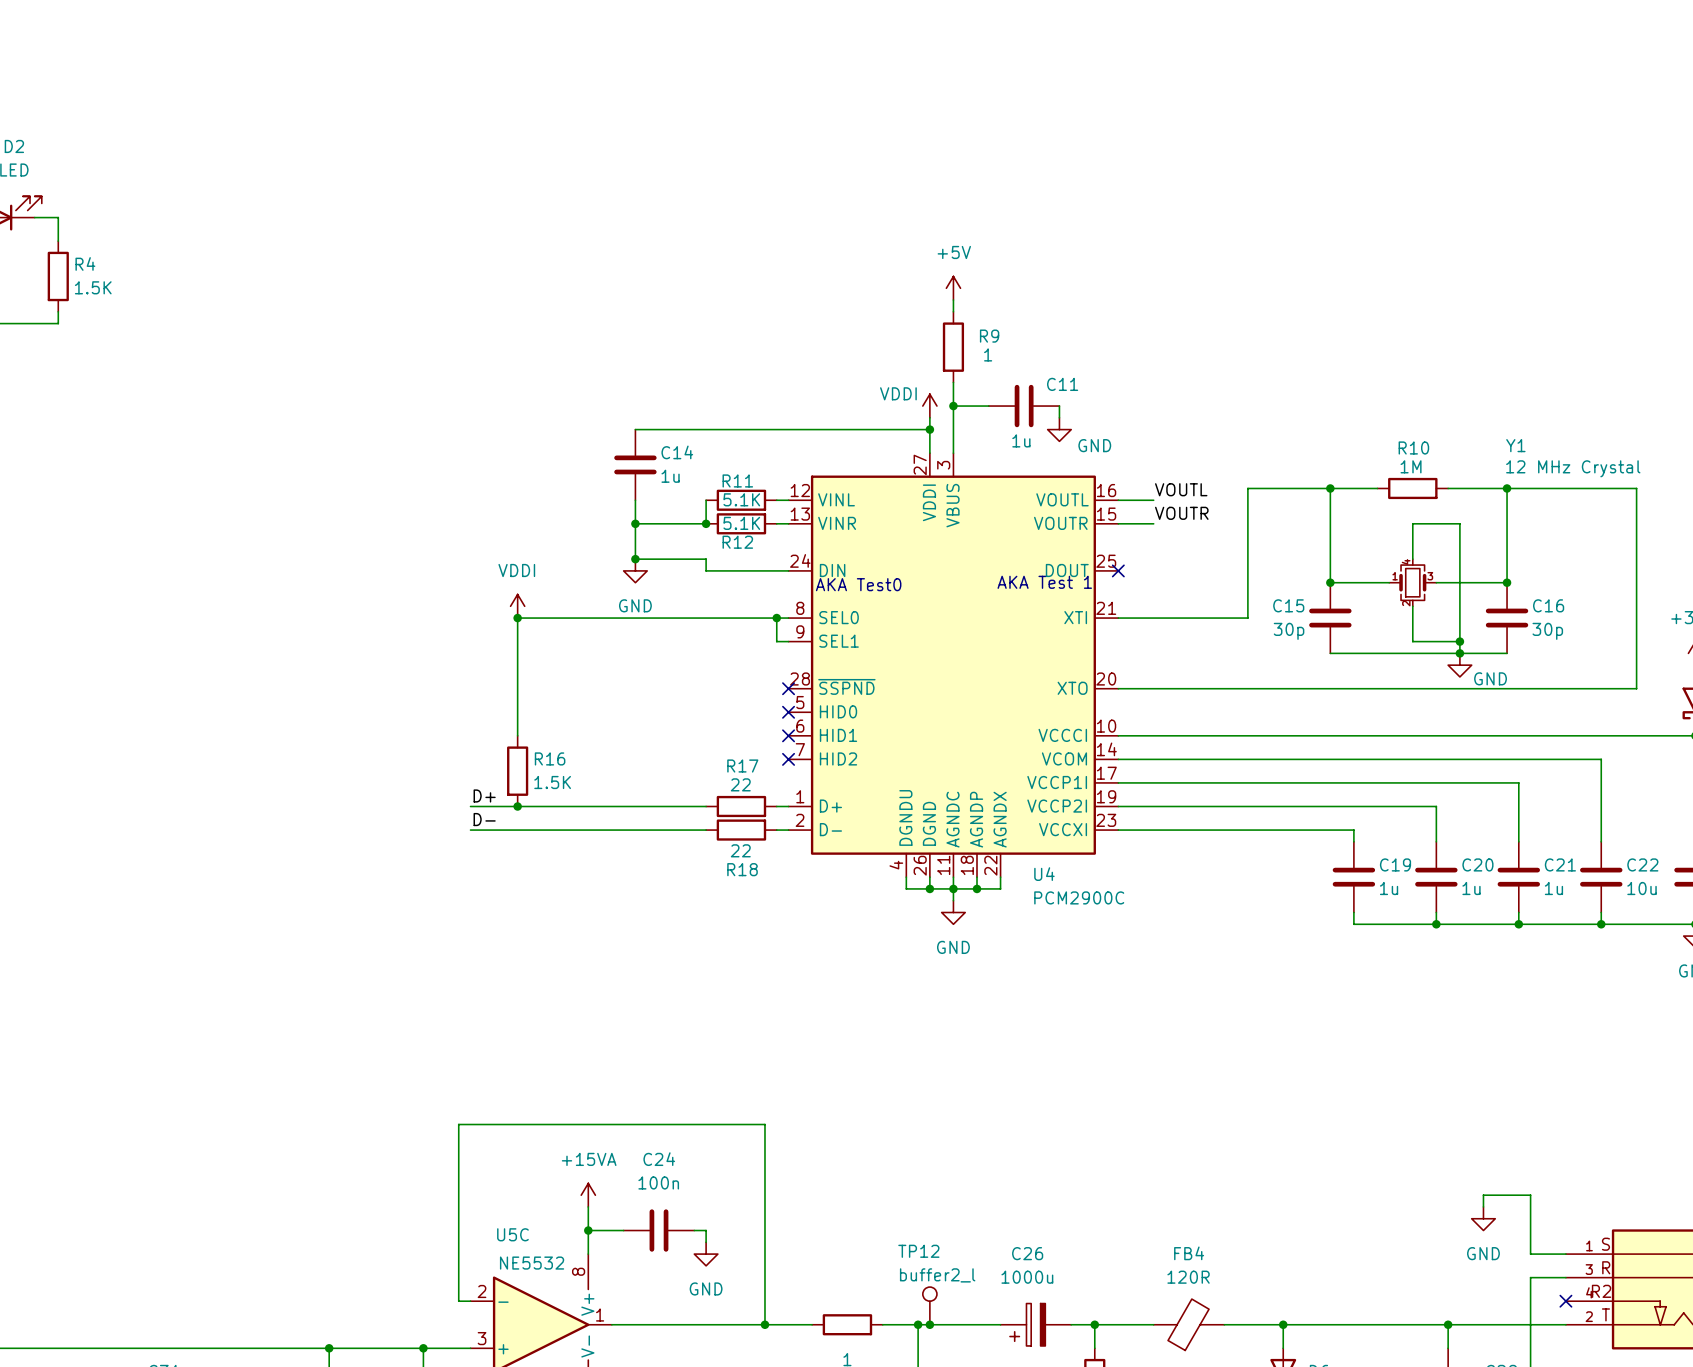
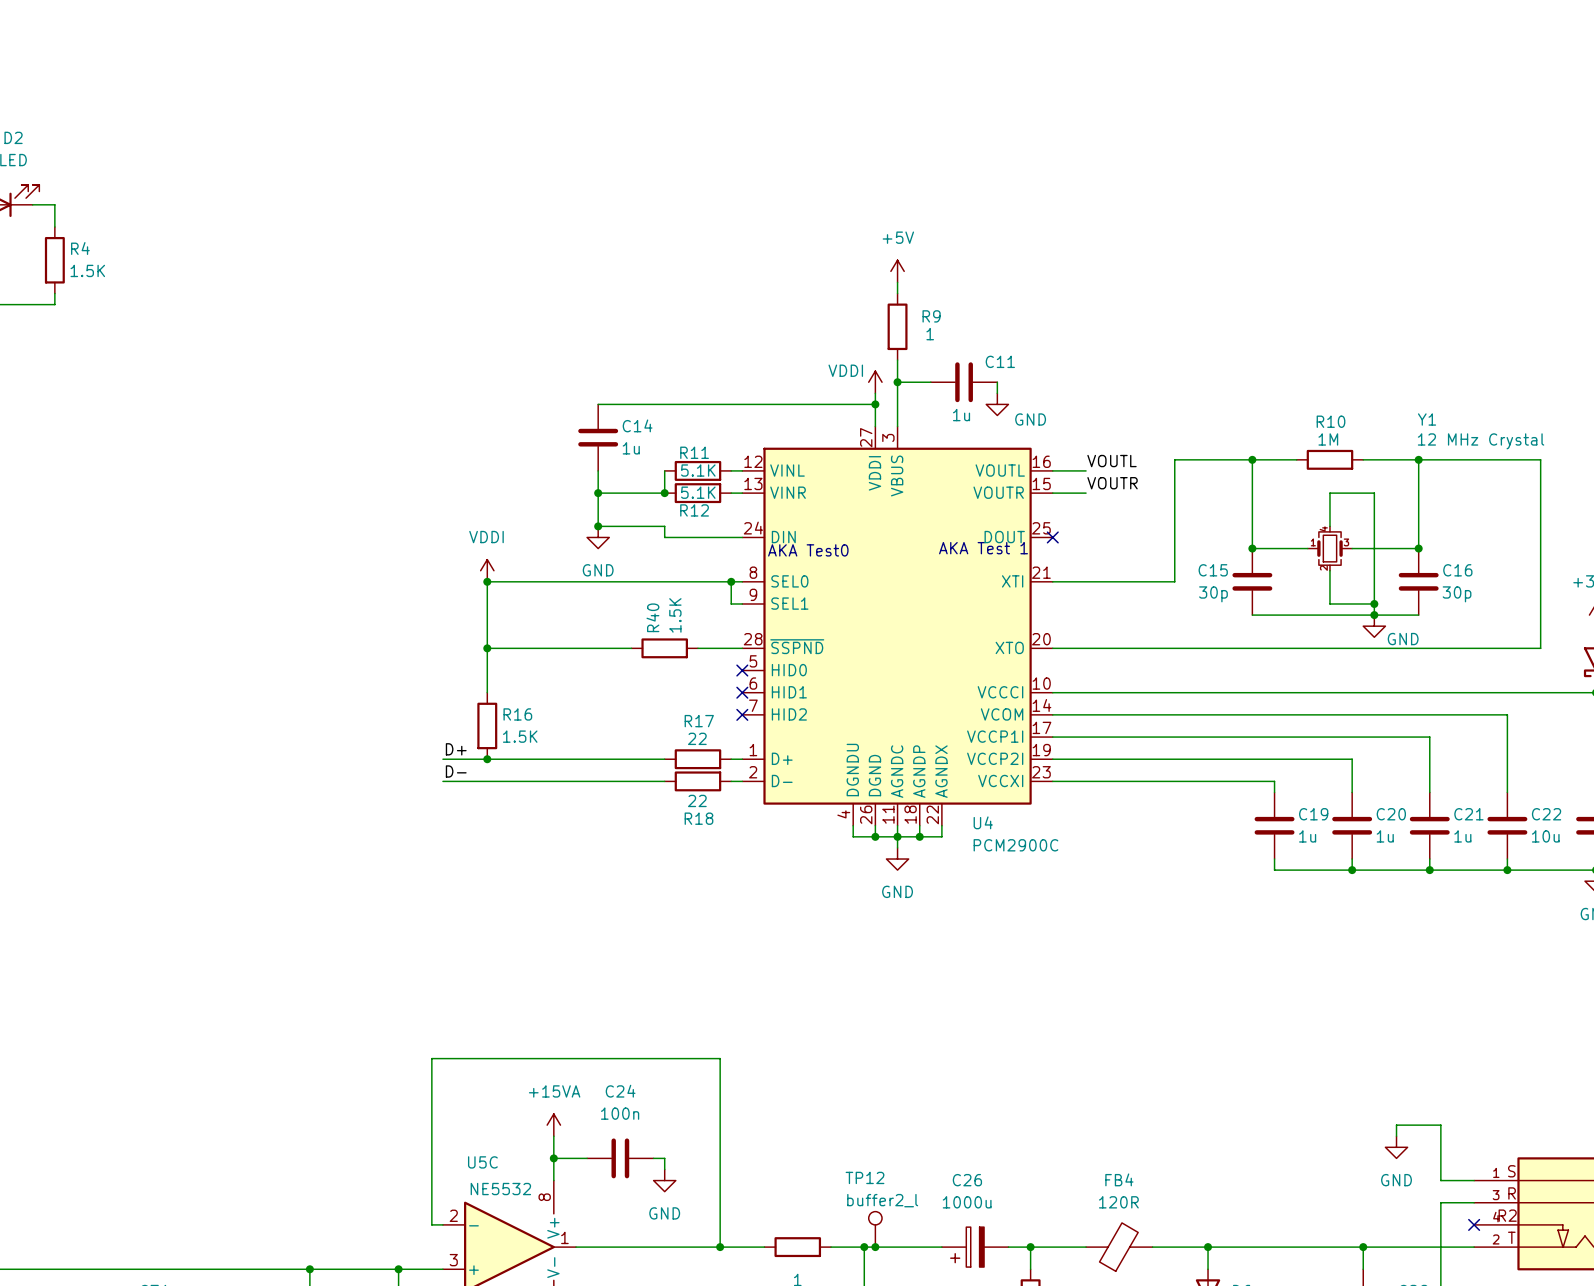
wire: none -> (487, 648) (631, 648)
junction: none -> (487, 648)
R40: none -> 1.5K (664, 648)
wire: none -> (697, 648) (742, 648)
no-connect mark: (788, 688) -> none

